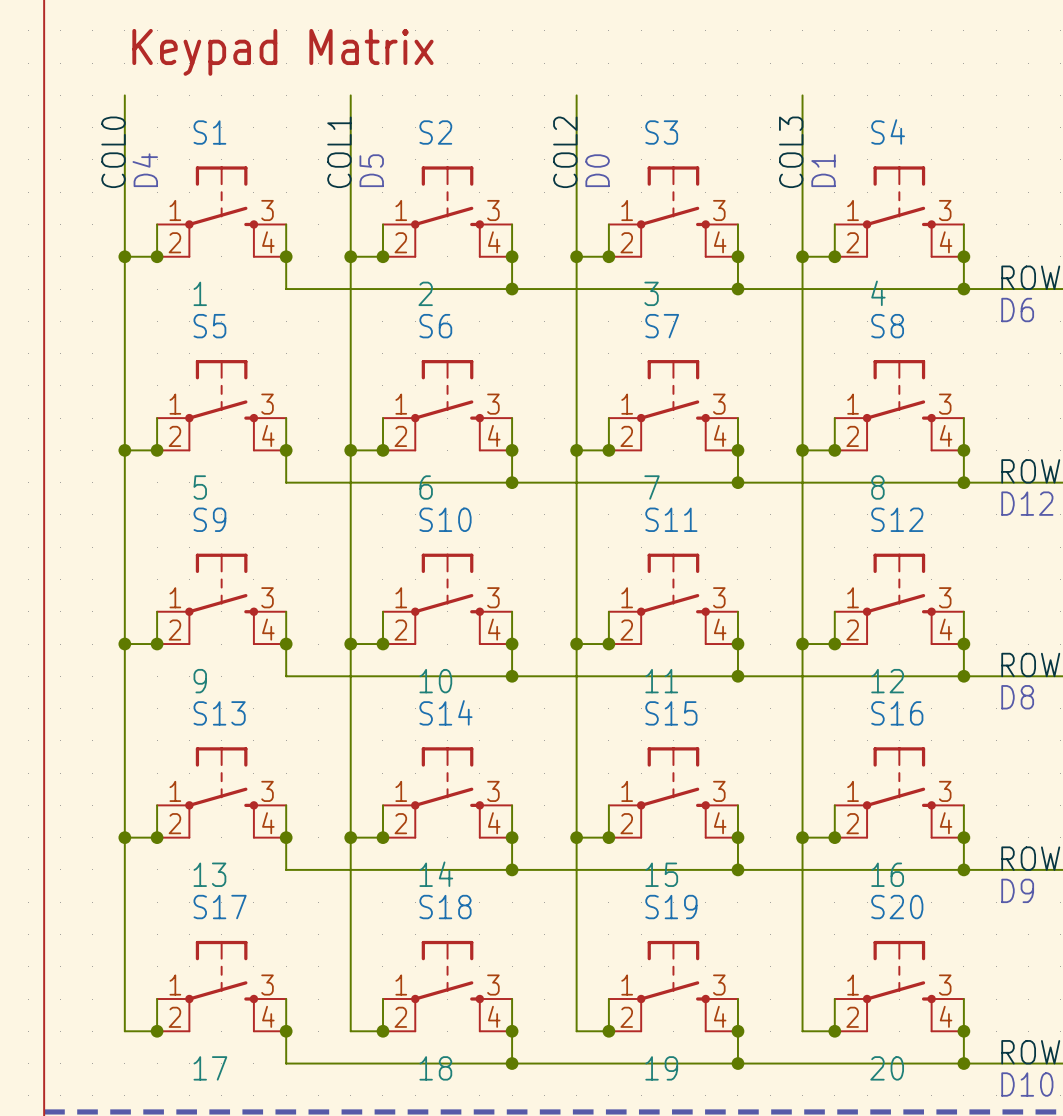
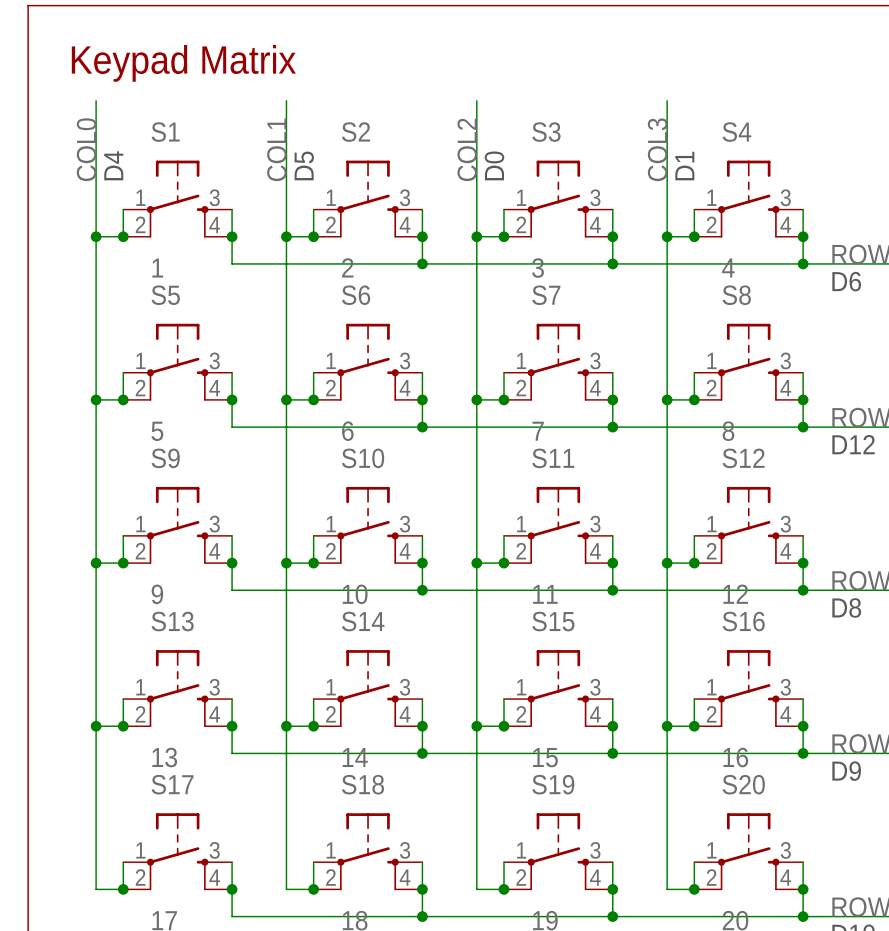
text position: Keypad Matrix (282, 52) -> Keypad Matrix (183, 63)

